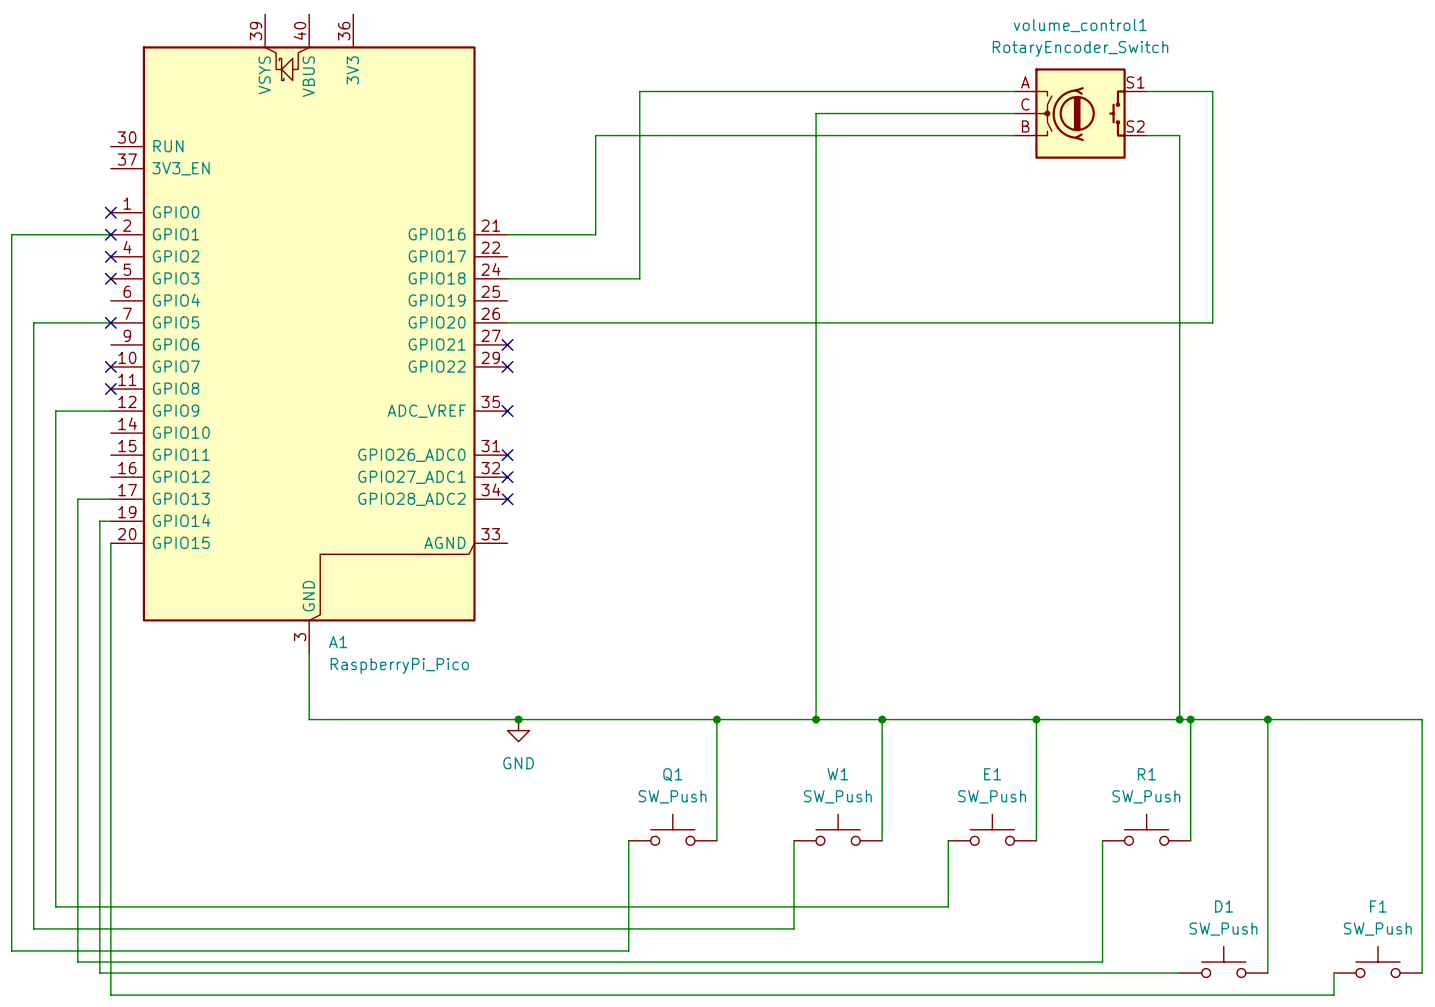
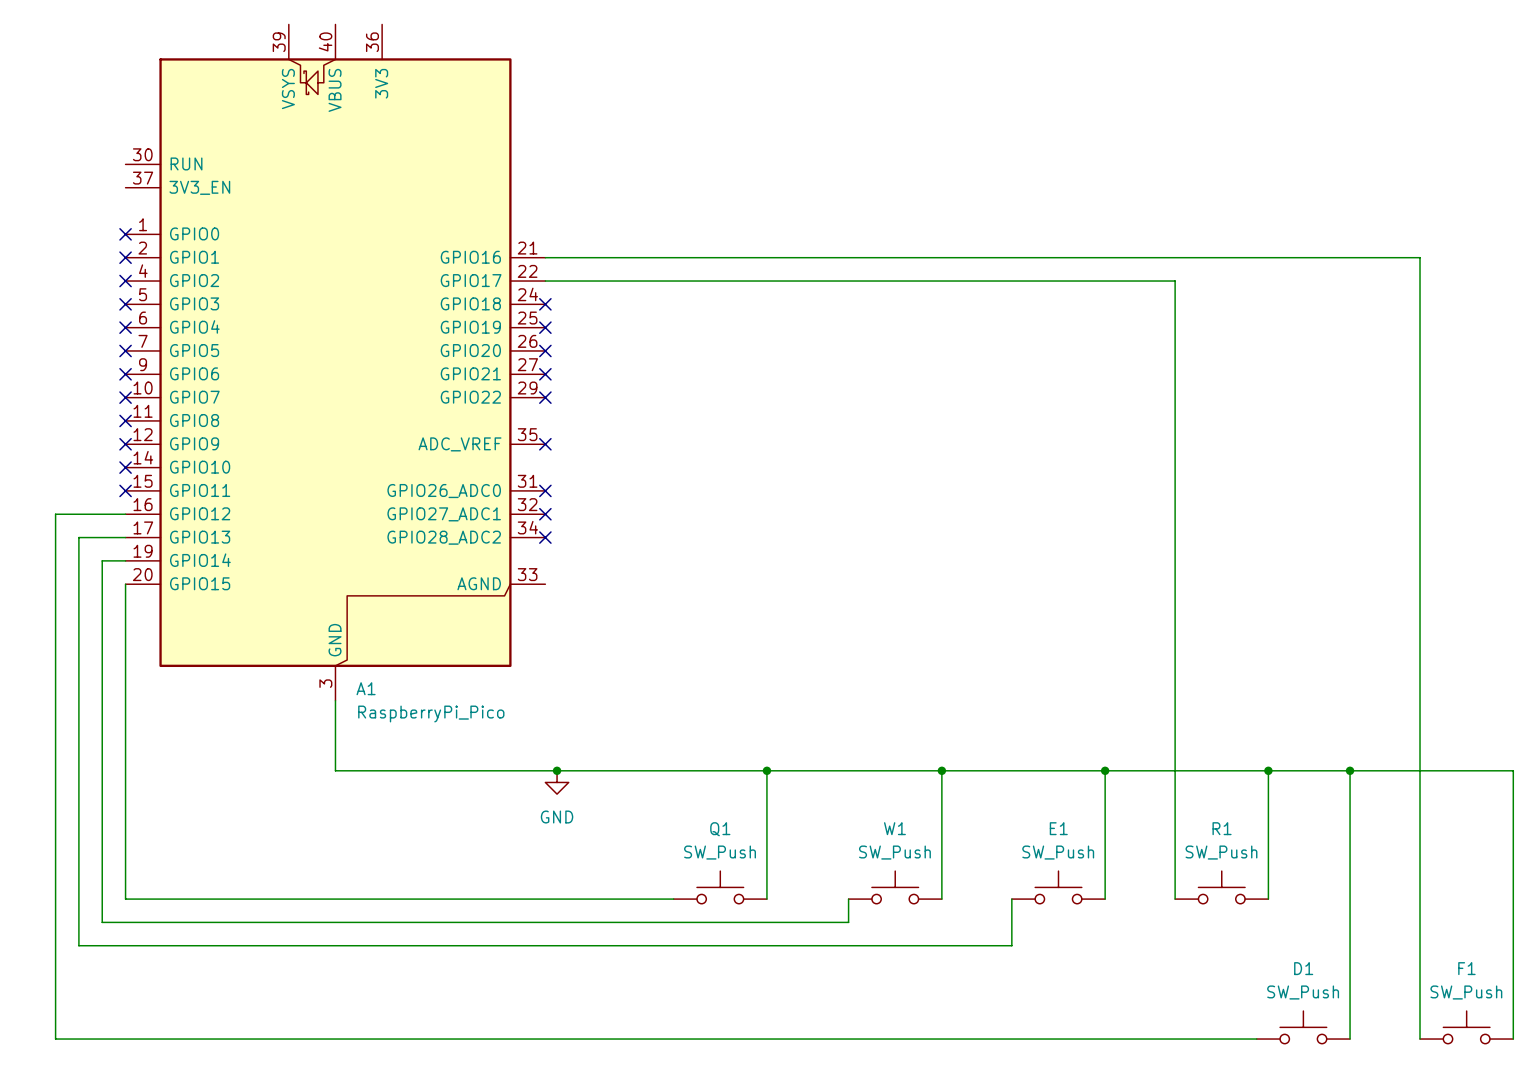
wire: (1014, 91) (639, 91) (639, 278) (507, 278) -> none
wire: (1146, 91) (1212, 91) (1212, 322) (507, 322) -> none
wire: (1014, 113) (816, 113) (816, 719) -> none
volume_control1: RotaryEncoder_Switch (1080, 113) -> none
wire: (1014, 135) (595, 135) (595, 234) -> none
wire: (1146, 135) (1179, 135) (1179, 719) -> none
wire: (110, 234) (11, 234) (11, 950) (628, 950) (628, 840) -> (125, 899) (673, 899)
no-connect mark: none -> (545, 304)
no-connect mark: none -> (125, 327)
no-connect mark: none -> (545, 327)
wire: (110, 322) (33, 322) (33, 928) (794, 928) (794, 862) -> (113, 560) (102, 560) (102, 922) (848, 922)
no-connect mark: none -> (545, 350)
no-connect mark: none -> (125, 374)
wire: (110, 411) (55, 411) (55, 906) (948, 906) (948, 884) -> (90, 537) (78, 537) (78, 945) (1011, 945)
no-connect mark: none -> (125, 444)
no-connect mark: none -> (125, 467)
no-connect mark: none -> (125, 490)
wire: (77, 499) (77, 961) (1102, 961) (1102, 840) -> (545, 281) (1175, 281) (1175, 899)
wire: (99, 521) (99, 973) -> (125, 514) (55, 514) (55, 1039) (113, 1039)
junction: (816, 719) -> none
junction: (1179, 719) -> none
wire: (110, 840) (110, 995) (1333, 995) (1333, 973) -> (638, 257) (1420, 257) (1420, 1039)

